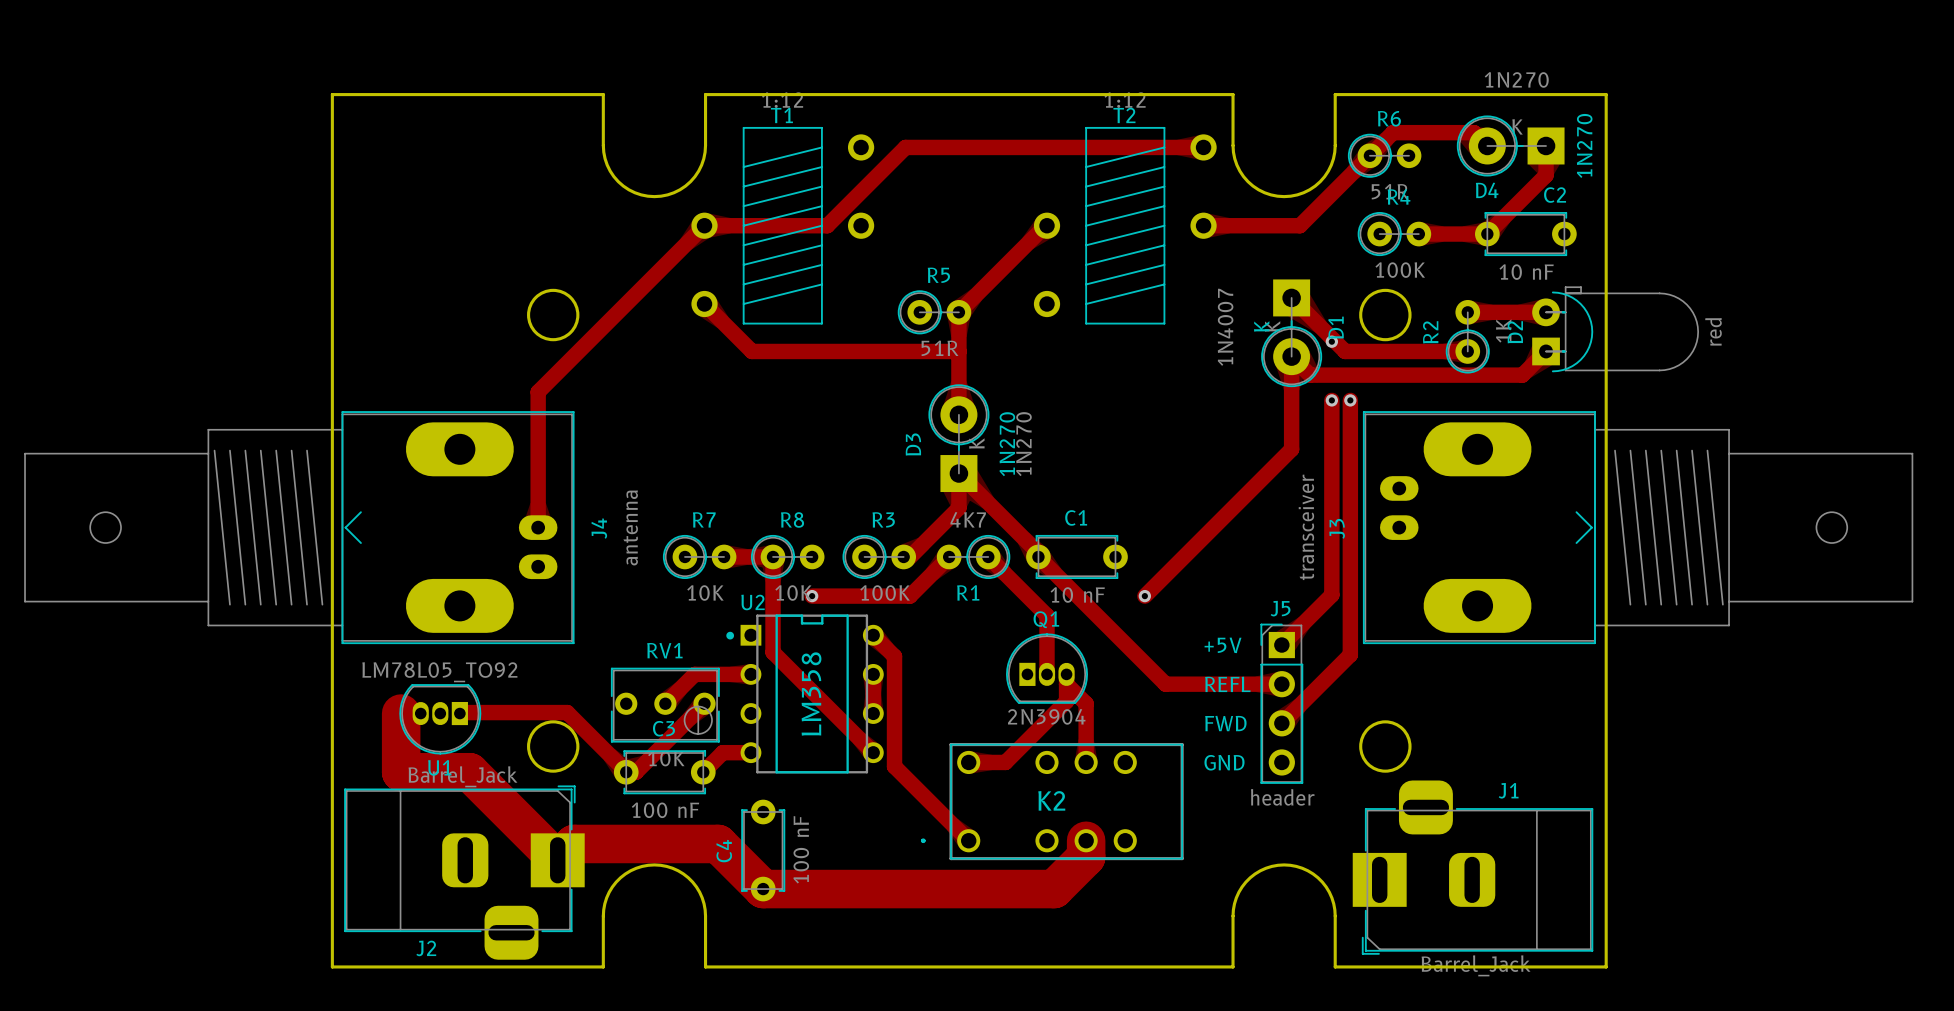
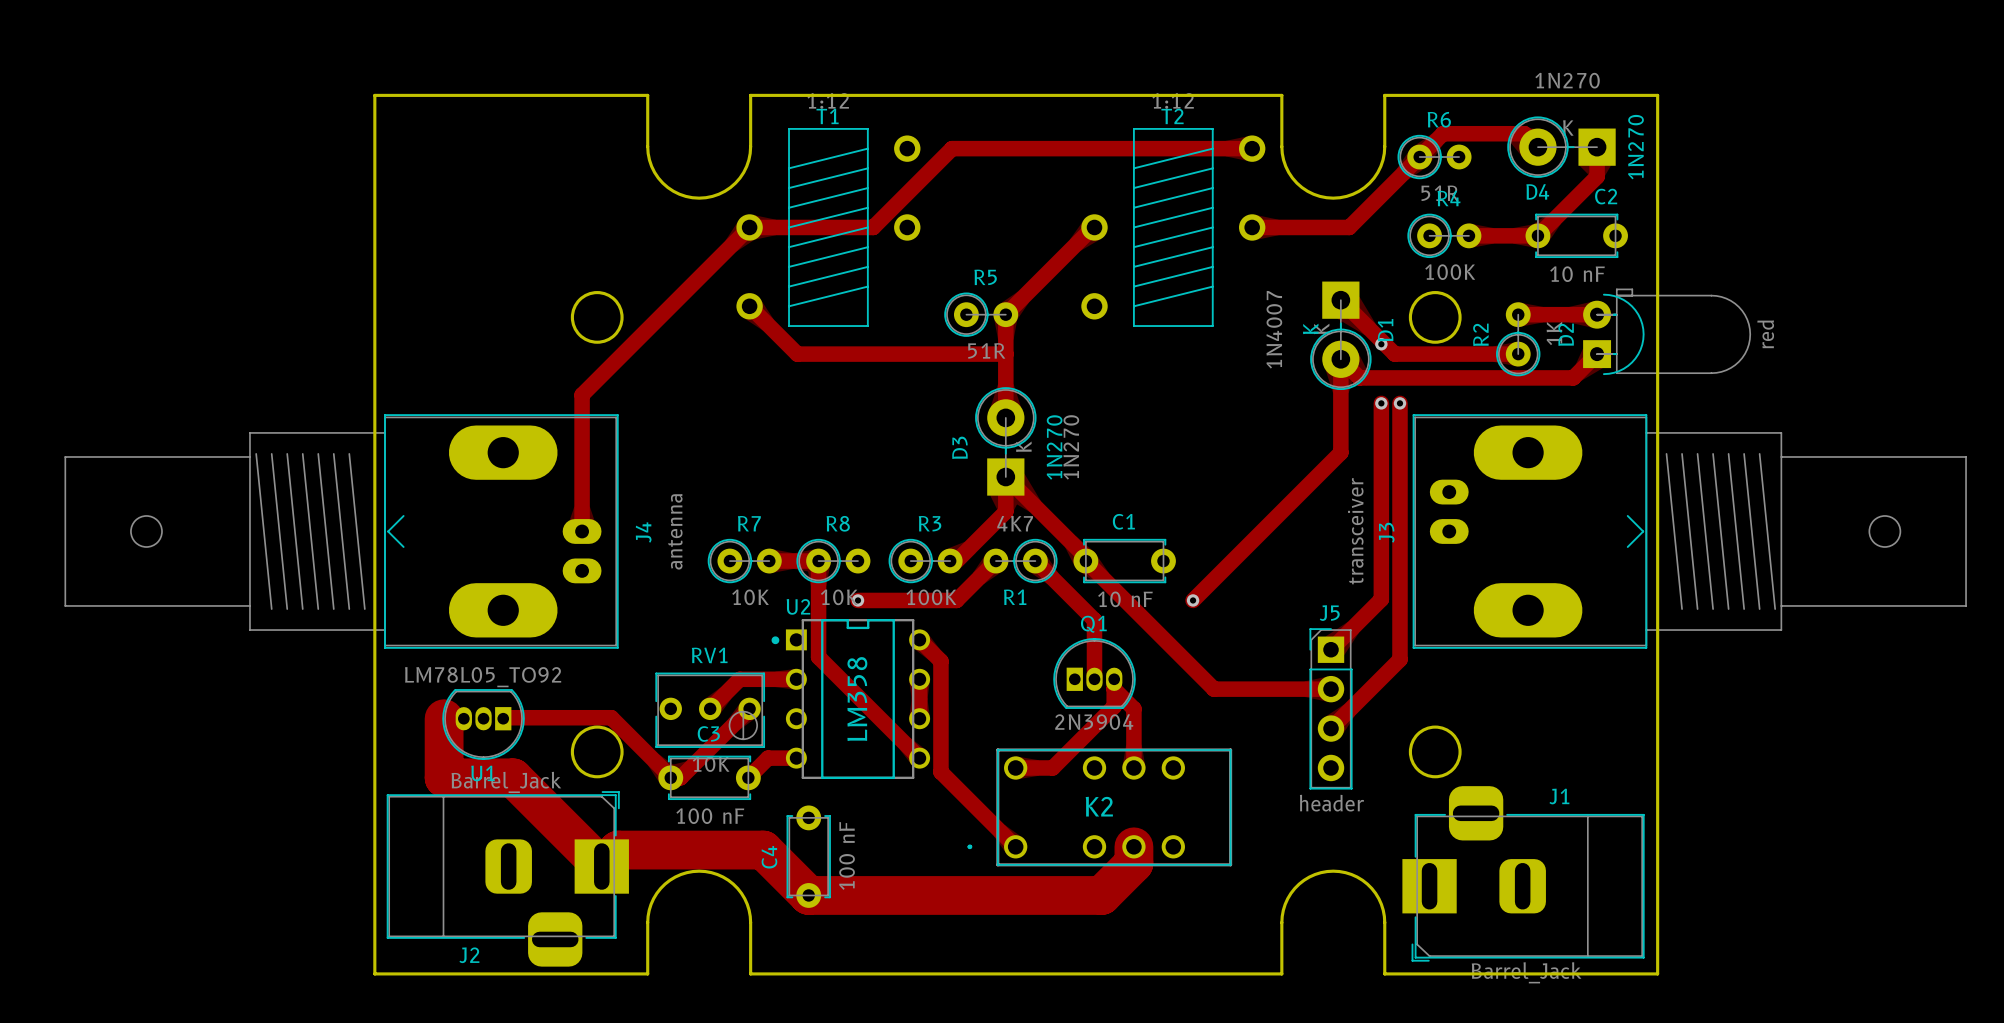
text: +5V (1223, 645) -> none
text: REFL (1227, 684) -> none
text: FWD (1225, 723) -> none
text: GND (1224, 762) -> none

